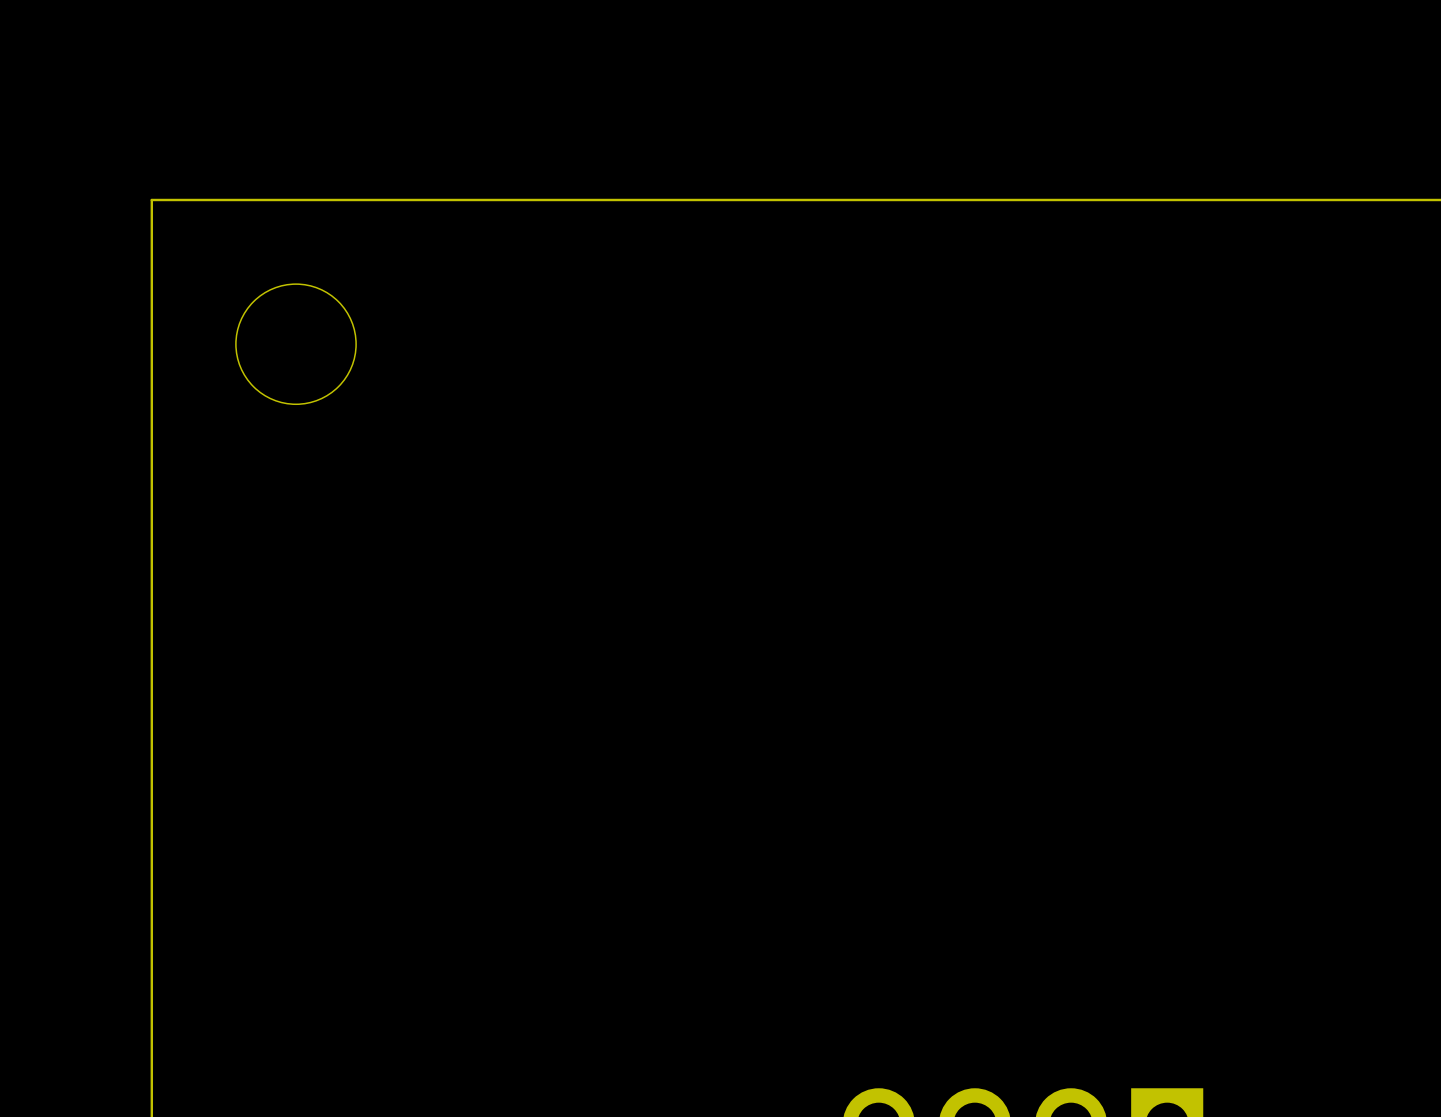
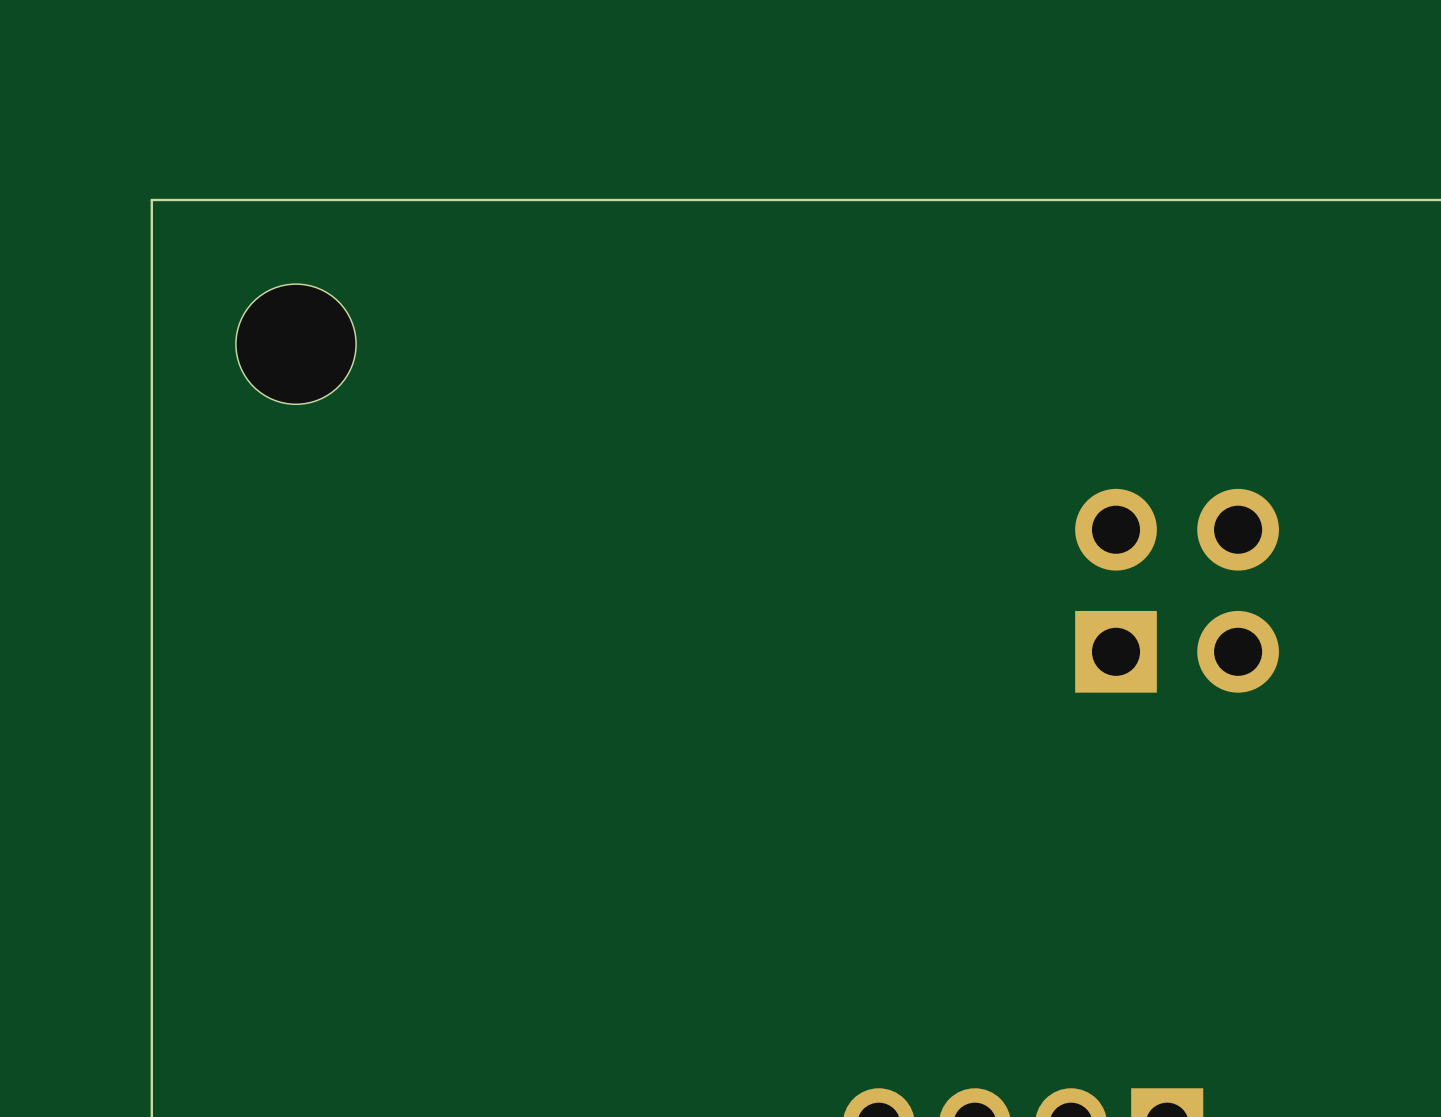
part: none -> (1177, 590)

